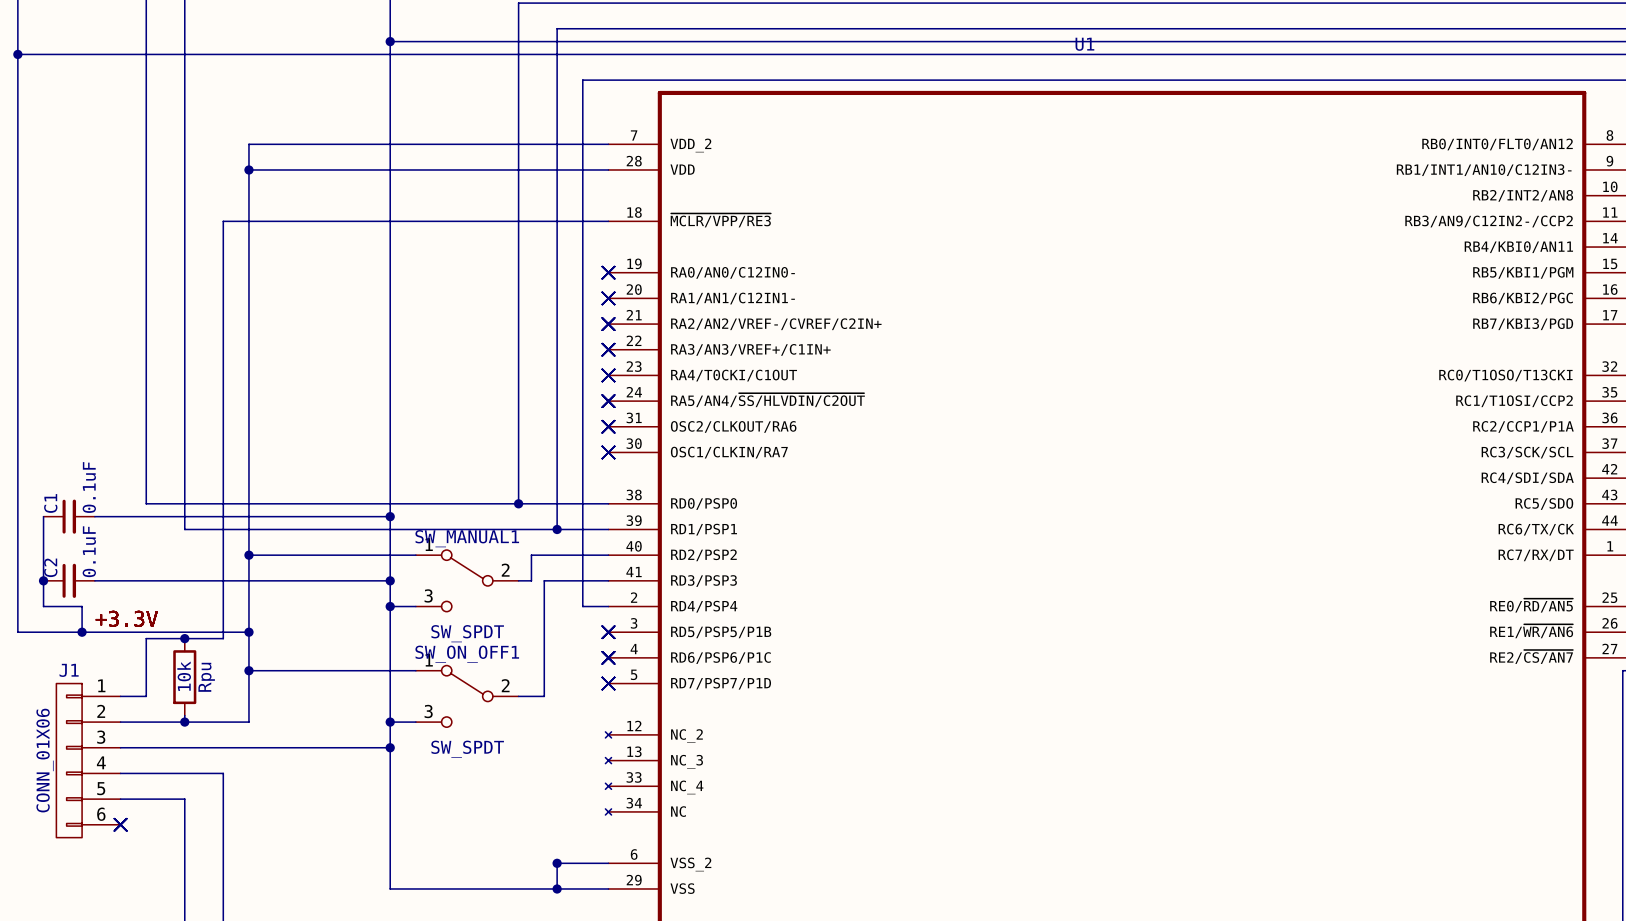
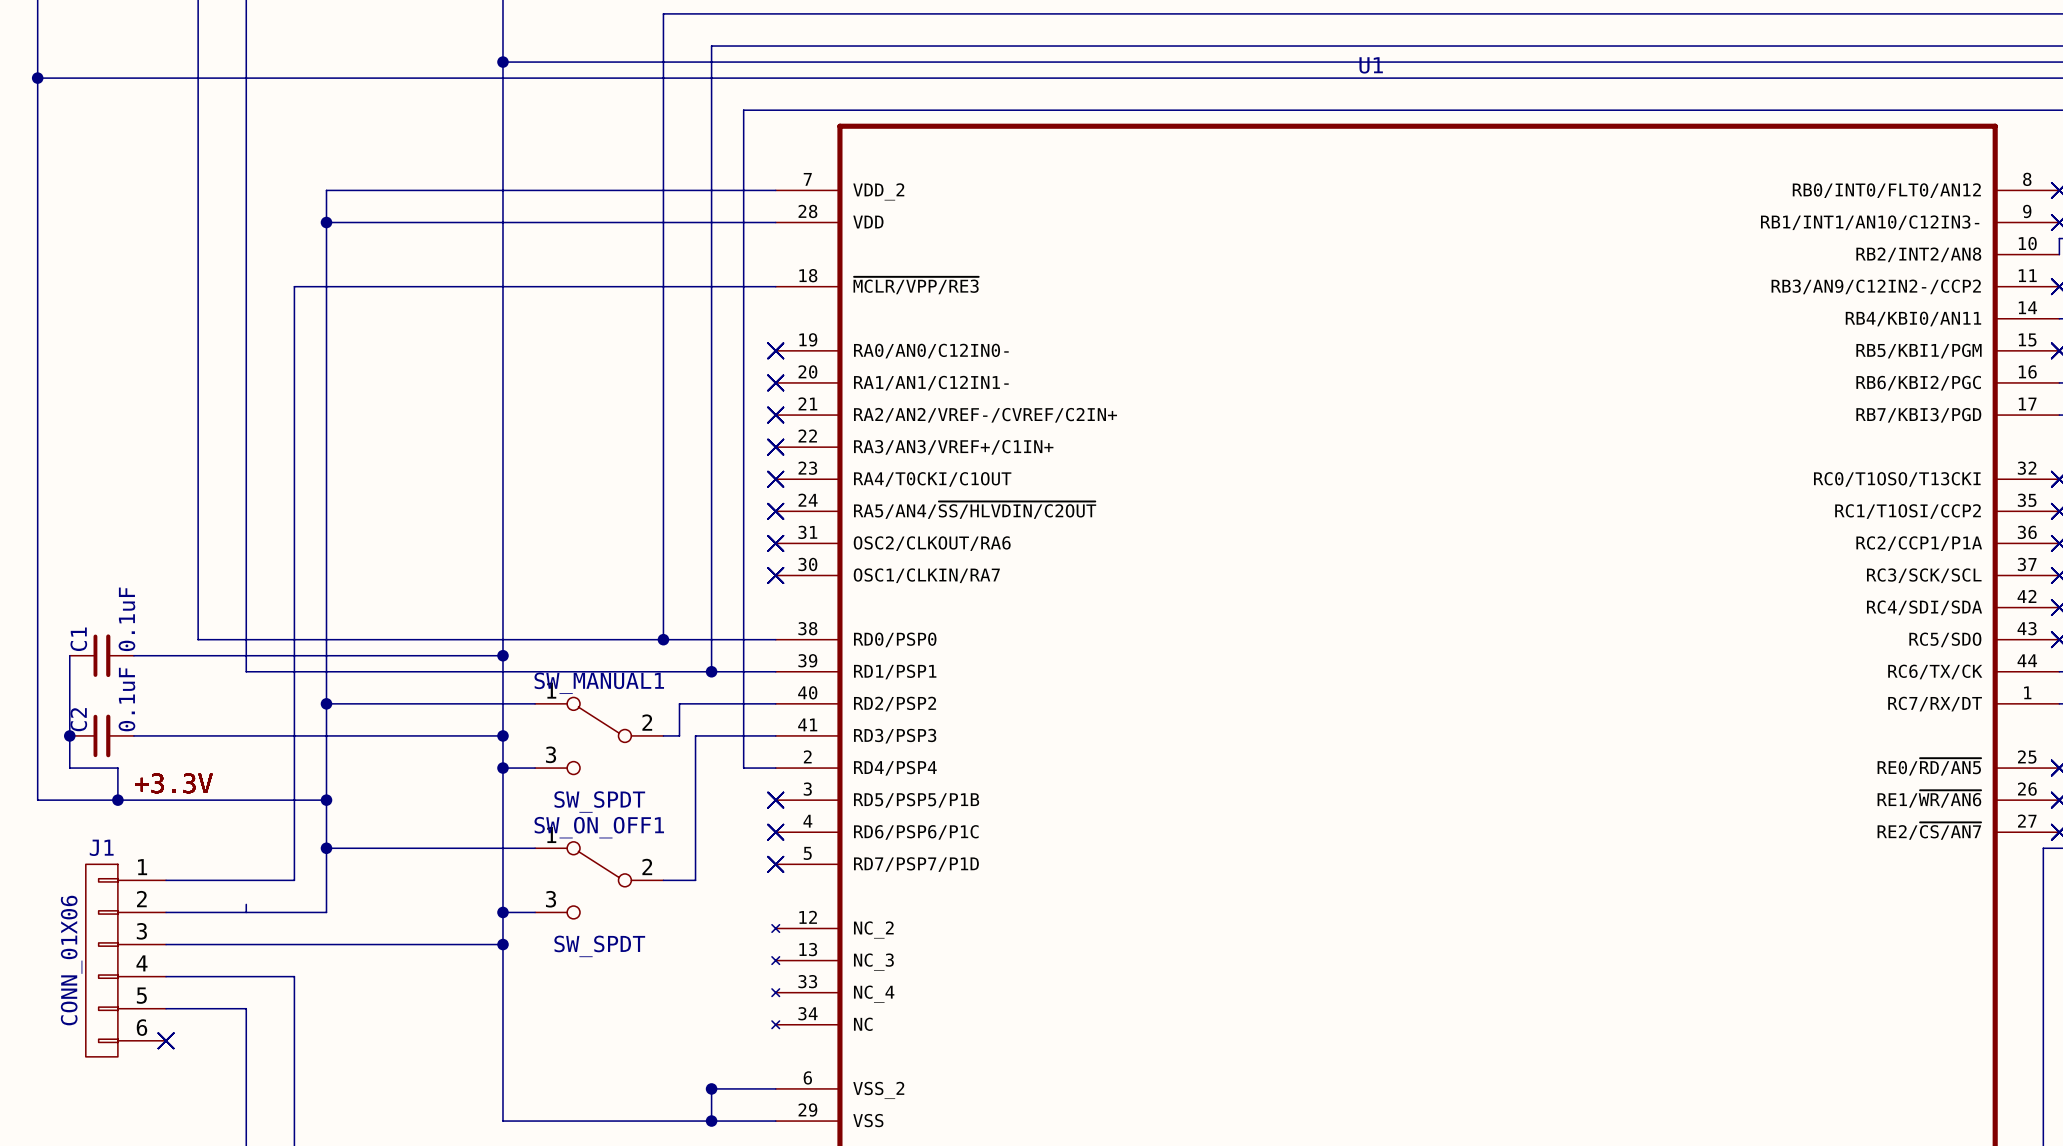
junction: (184, 638) -> none
wire: (223, 638) (146, 638) (146, 696) -> (294, 808) (294, 880) (198, 880)
Rpu: 10k (184, 677) -> none
junction: (184, 722) -> none

